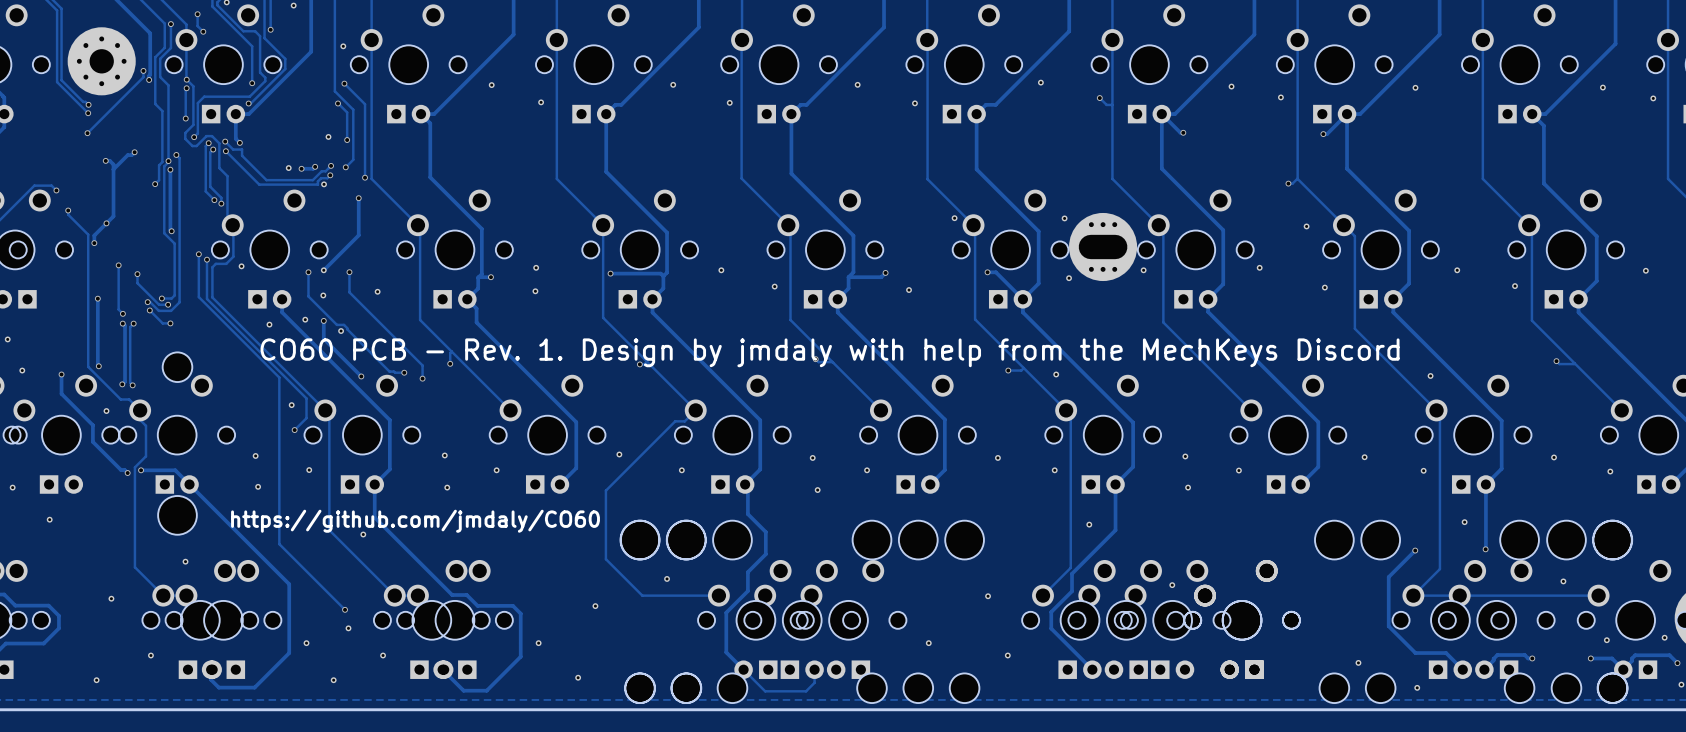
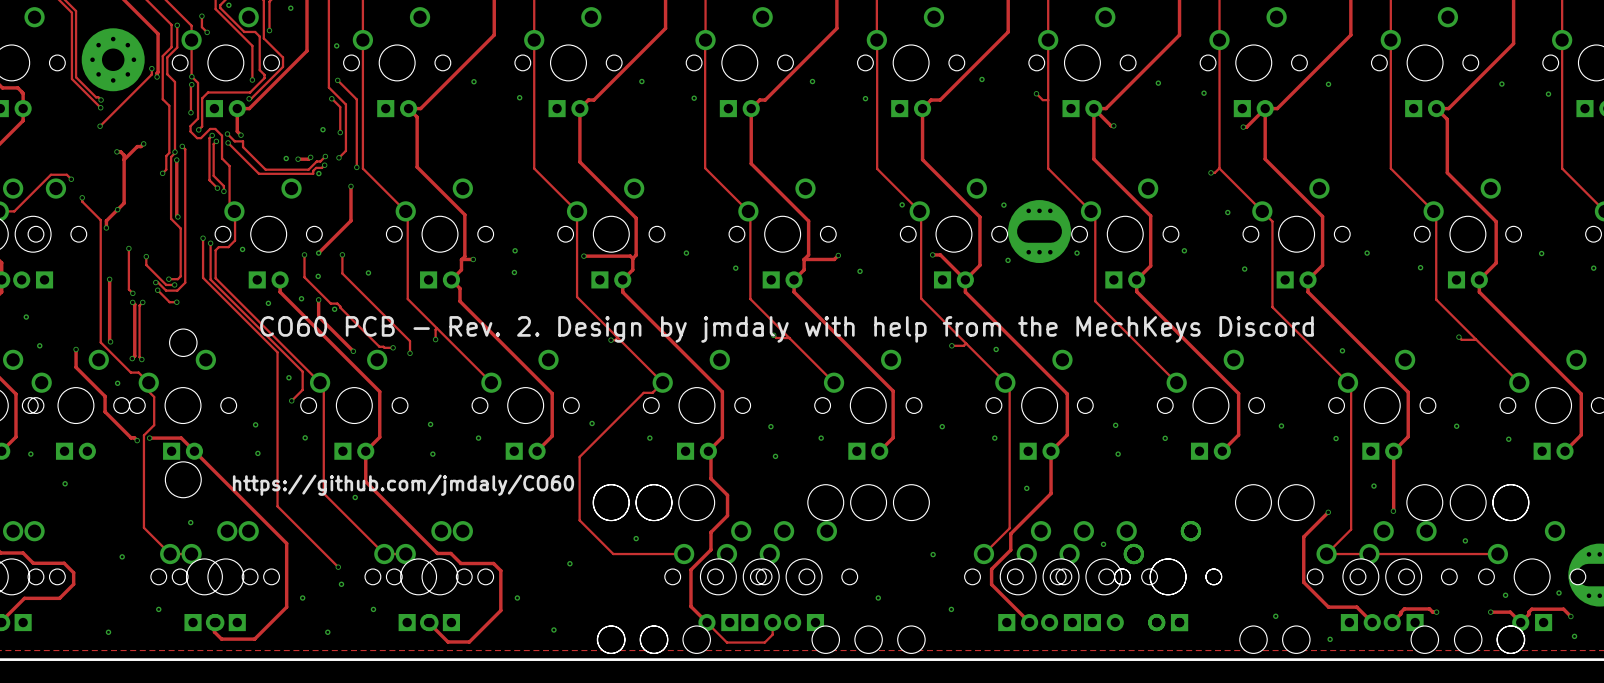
text: CO60 PCB - Rev. 1. Design by jmdaly with help from the MechKeys Discord (830, 352) -> CO60 PCB - Rev. 2. Design by jmdaly with help from the MechKeys Discord (786, 329)

